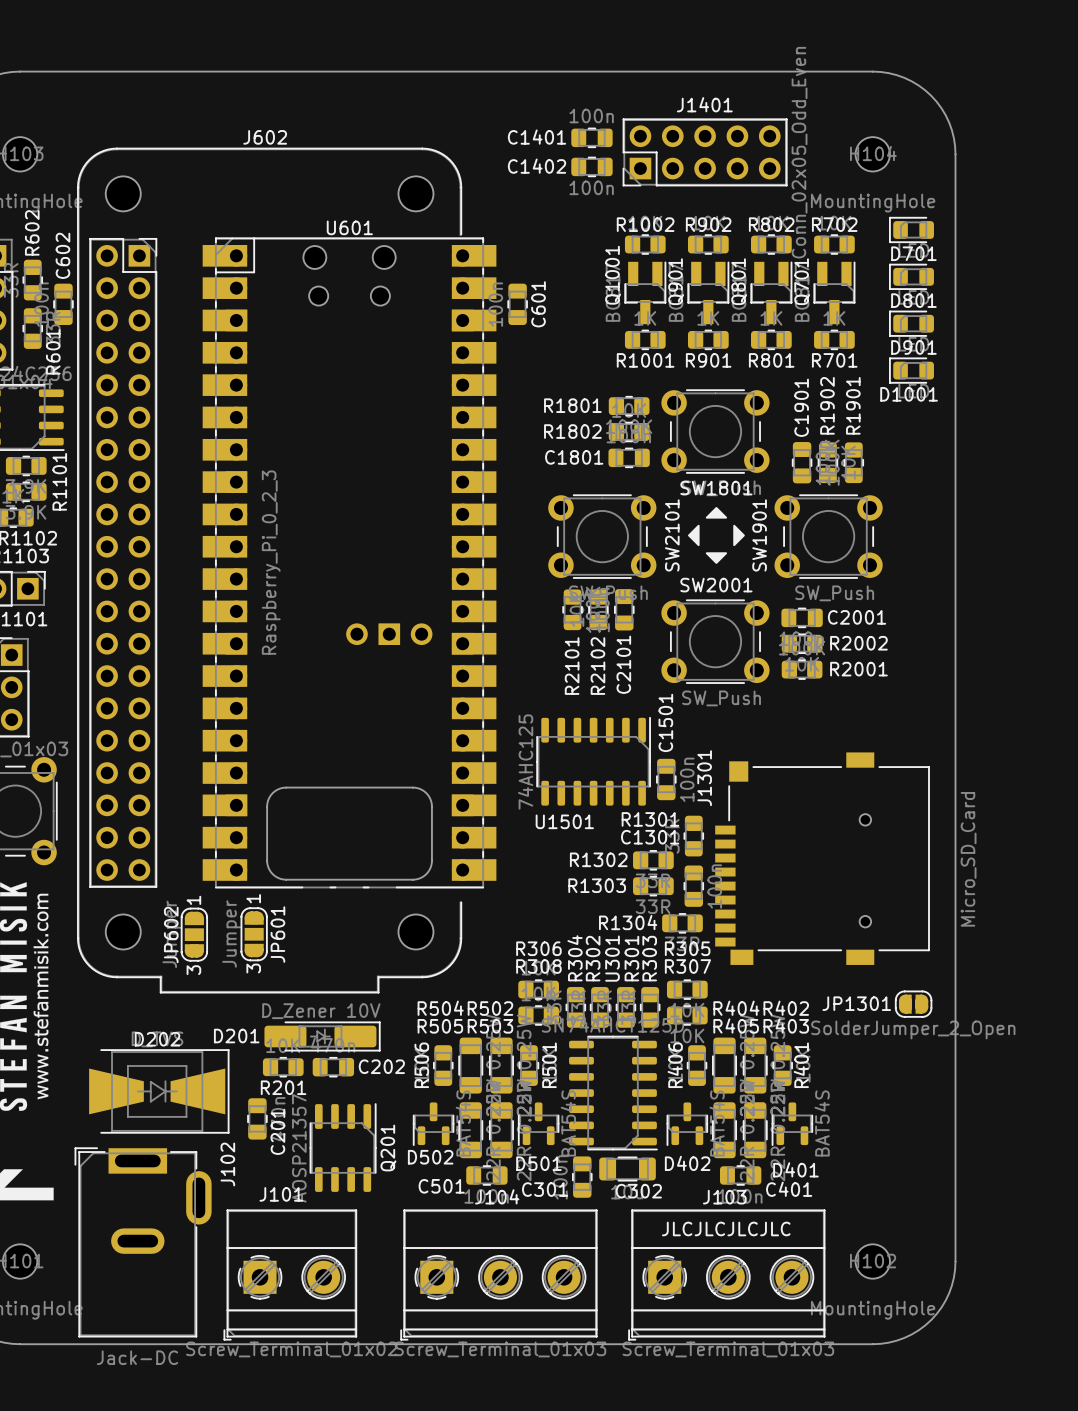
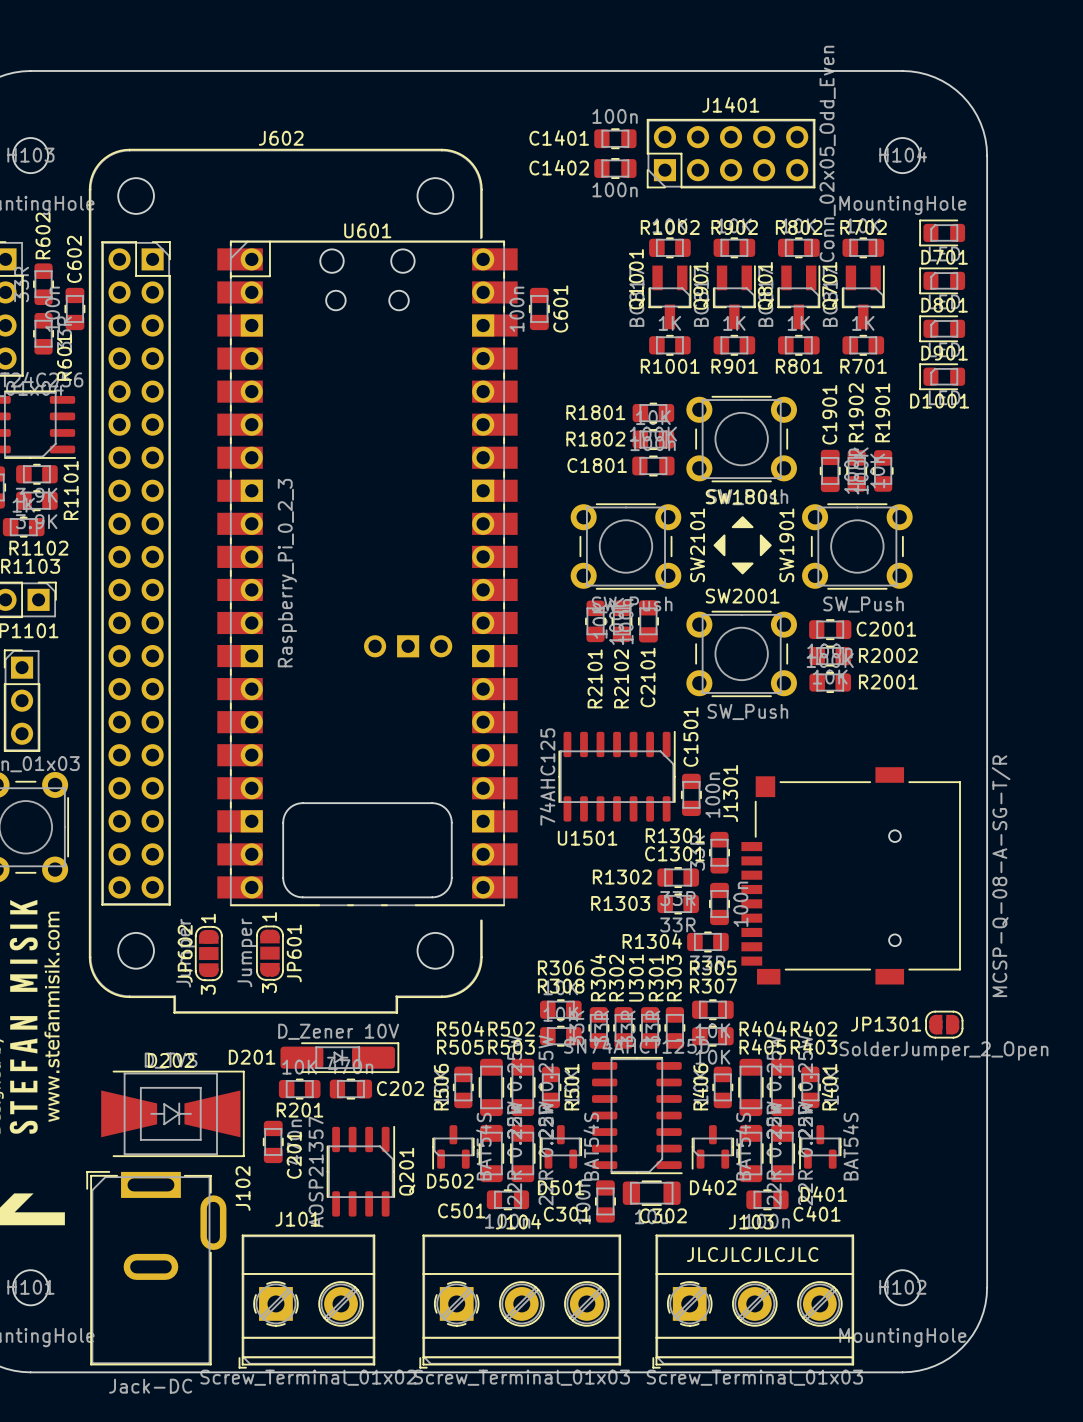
J1301 value: Micro_SD_Card (968, 859) -> MCSP-Q-08-A-SG-T/R (1001, 876)

